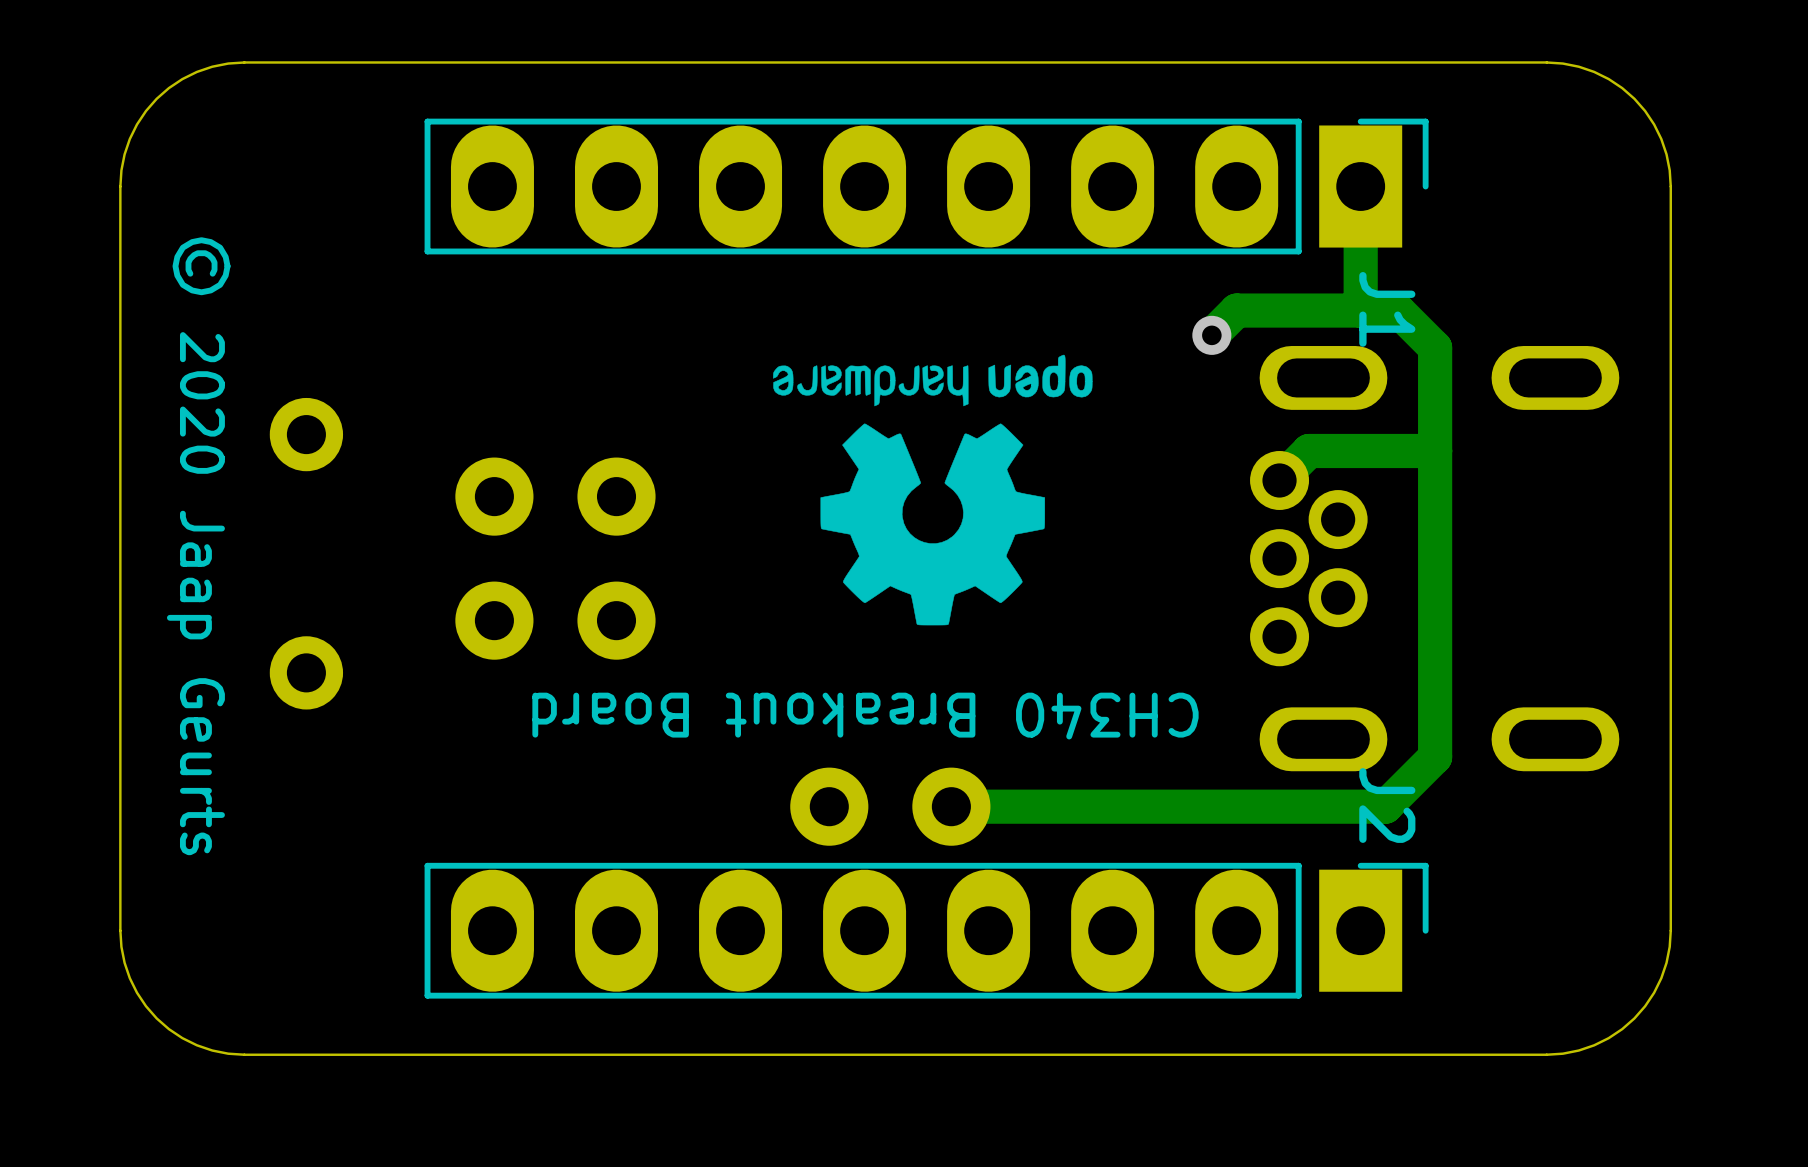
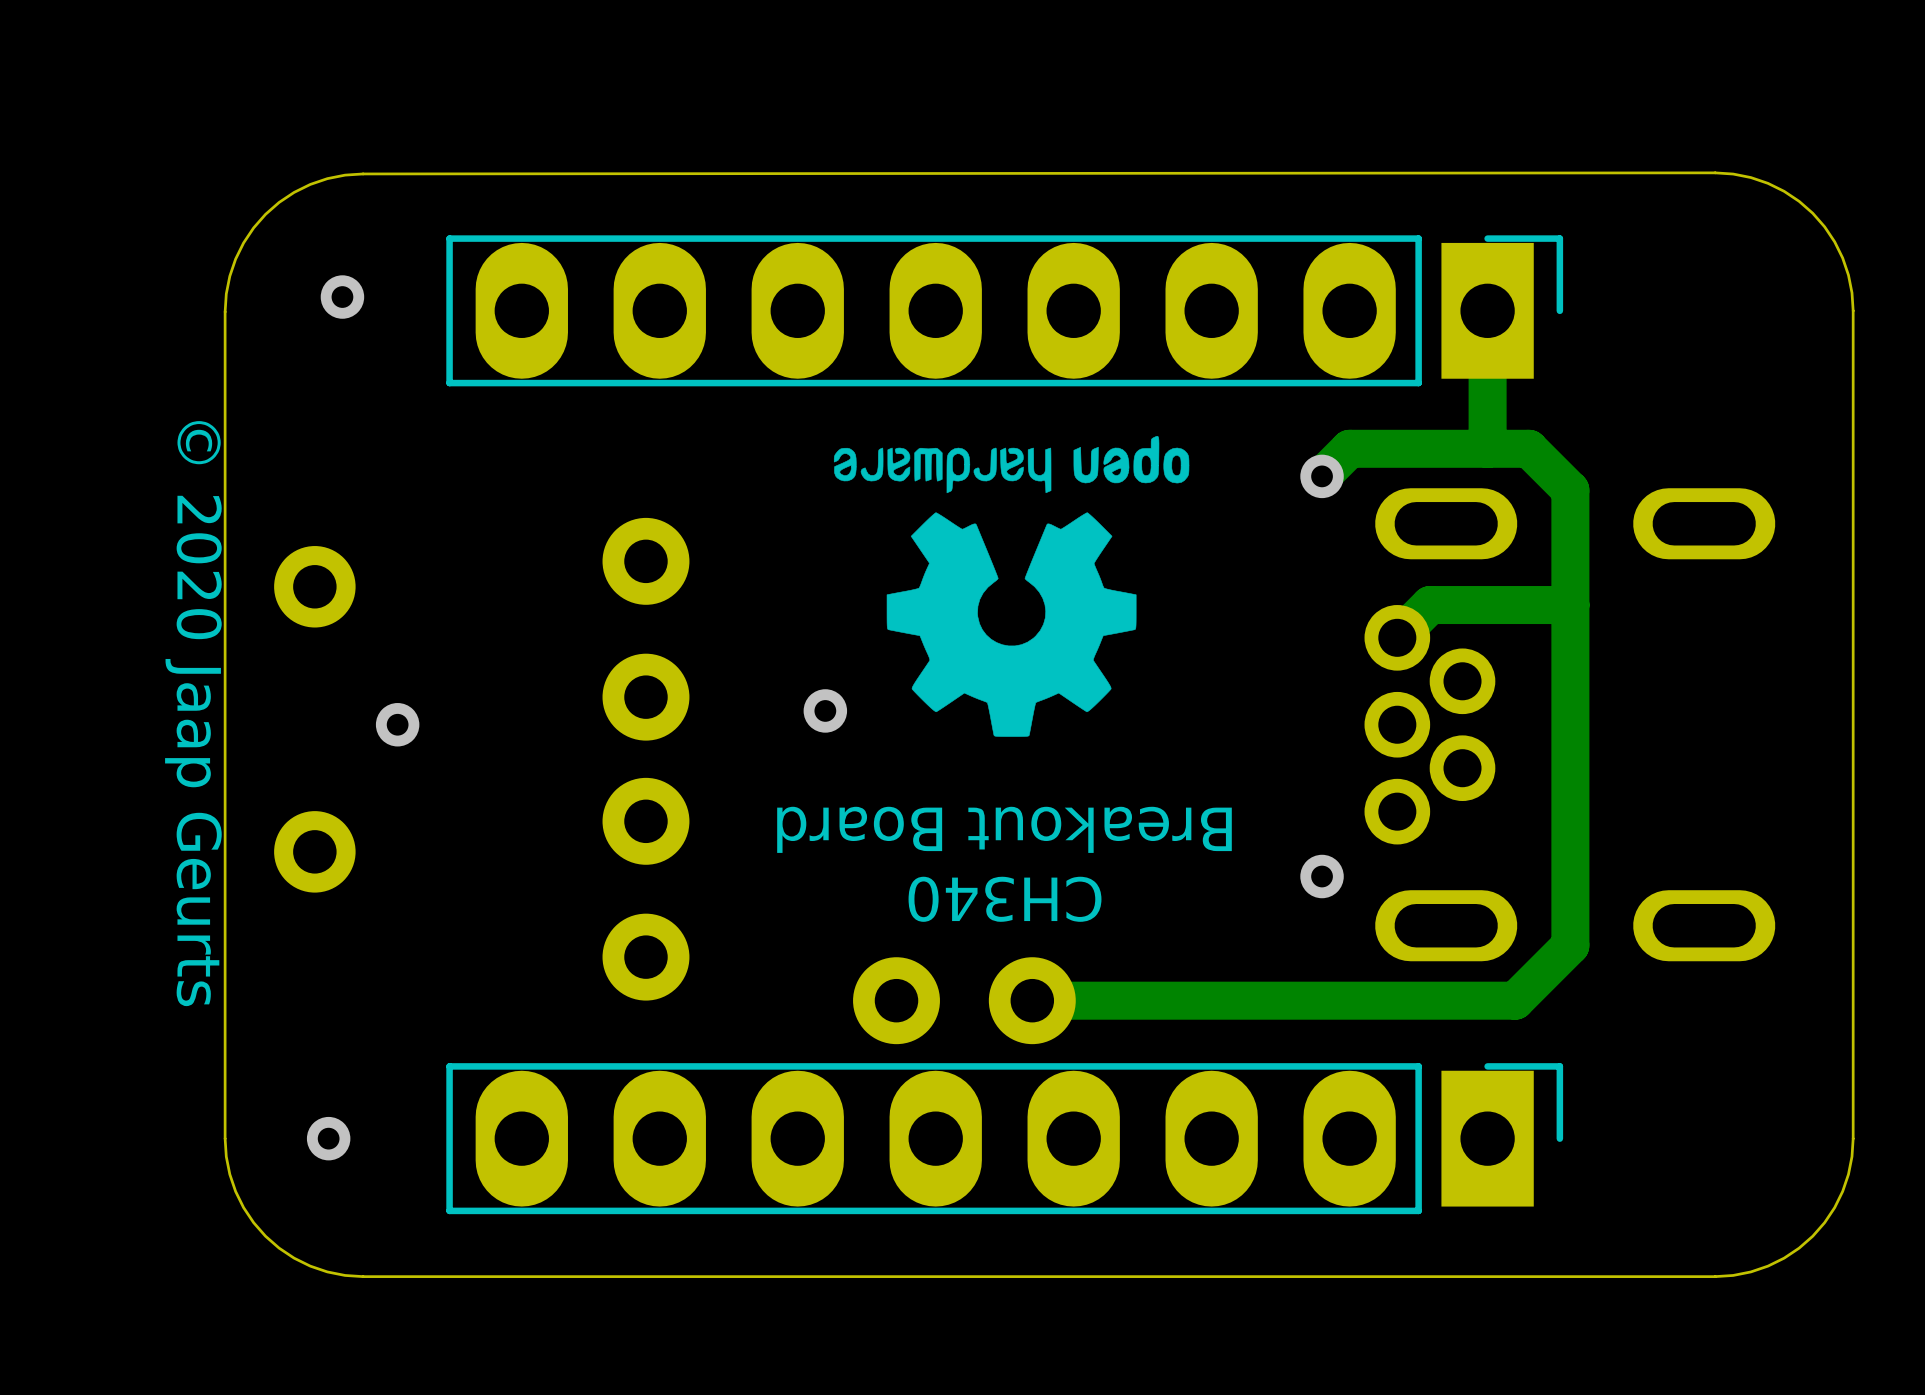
via: none -> (342, 297)
J1 name: J1 (1387, 309) -> none
drawing position: (932, 490) -> (1011, 586)
part rotation: 0° (555, 496) -> 90° clockwise (645, 629)
via: none -> (825, 710)
via: none -> (397, 724)
part: (555, 620) -> none
via: none -> (1322, 876)
part: none -> (645, 889)
text: CH340 Breakout Board (865, 716) -> Breakout Board (1004, 829)
text: none -> CH340 (1005, 899)
J2 name: J2 (1387, 805) -> none
via: none -> (328, 1138)
board edge: (1546, 1054) (1578, 1050) (1594, 1045) (1608, 1038) (1634, 1018) (1645, 1006) (1661, 978) (1669, 946) (1670, 186) (1666, 154) (1654, 124) (1634, 98) (1622, 88) (1594, 71) (1578, 66) (1546, 62) (228, 63) (196, 71) (182, 79) (156, 98) (136, 124) (124, 154) (121, 170) (121, 946) (129, 978) (146, 1006) (168, 1029) (196, 1045) (212, 1050) (244, 1054) (349, 1054) -> (1694, 1276) (1733, 1275) (1750, 1271) (1784, 1258) (1799, 1248) (1824, 1222) (1842, 1191) (1848, 1174) (1853, 1138) (1851, 292) (1848, 275) (1834, 241) (1812, 213) (1799, 201) (1768, 183) (1750, 177) (1715, 172) (363, 173) (327, 178) (310, 184) (279, 202) (253, 227) (243, 242) (229, 276) (225, 311) (226, 1156) (235, 1191) (253, 1222) (265, 1236) (294, 1258) (310, 1266) (327, 1271) (363, 1276)

